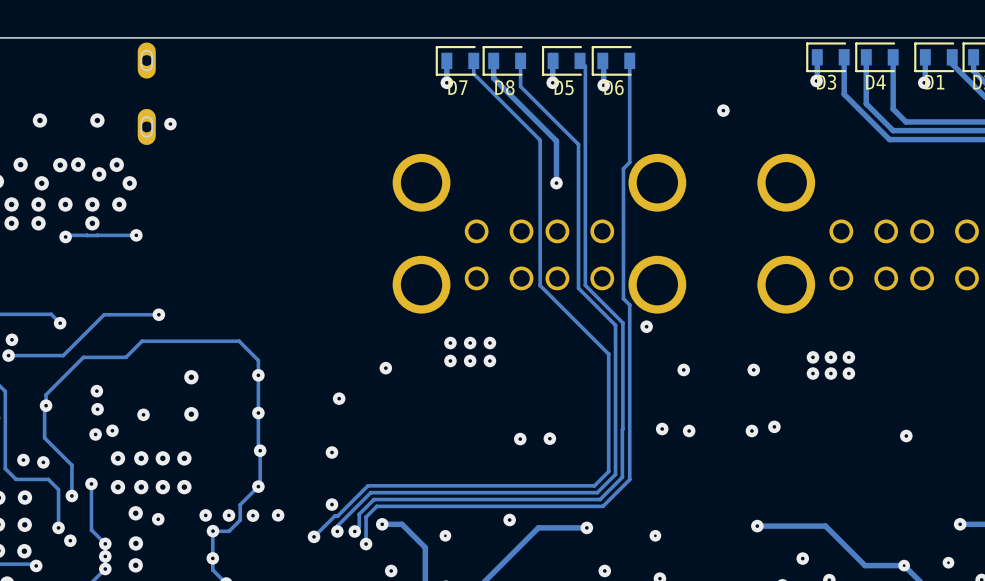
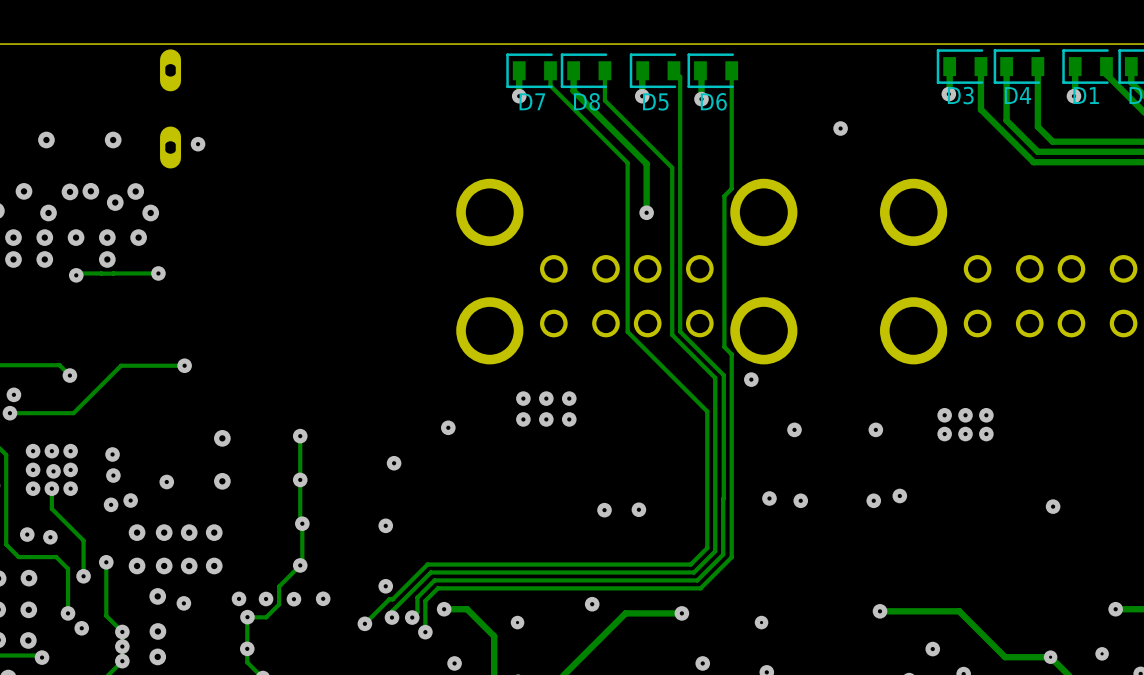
track: (258, 375) (258, 360) (239, 341) (142, 341) (125, 357) (83, 357) (46, 394) (44, 420) -> none
via: none -> (33, 451)
via: none -> (51, 451)
via: none -> (70, 451)
via: none -> (33, 469)
via: none -> (70, 469)
via: none -> (33, 488)
via: none -> (51, 488)
via: none -> (70, 488)

